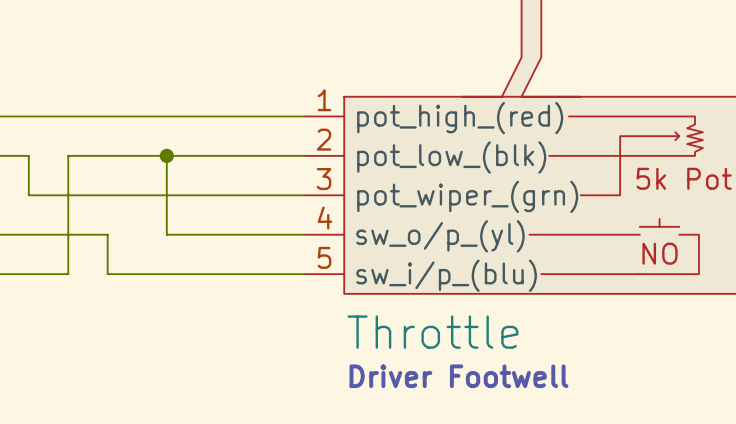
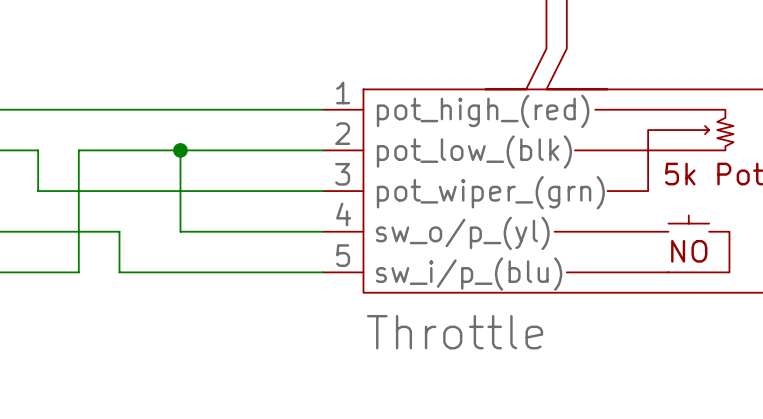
text: Driver Footwell (458, 376) -> none

